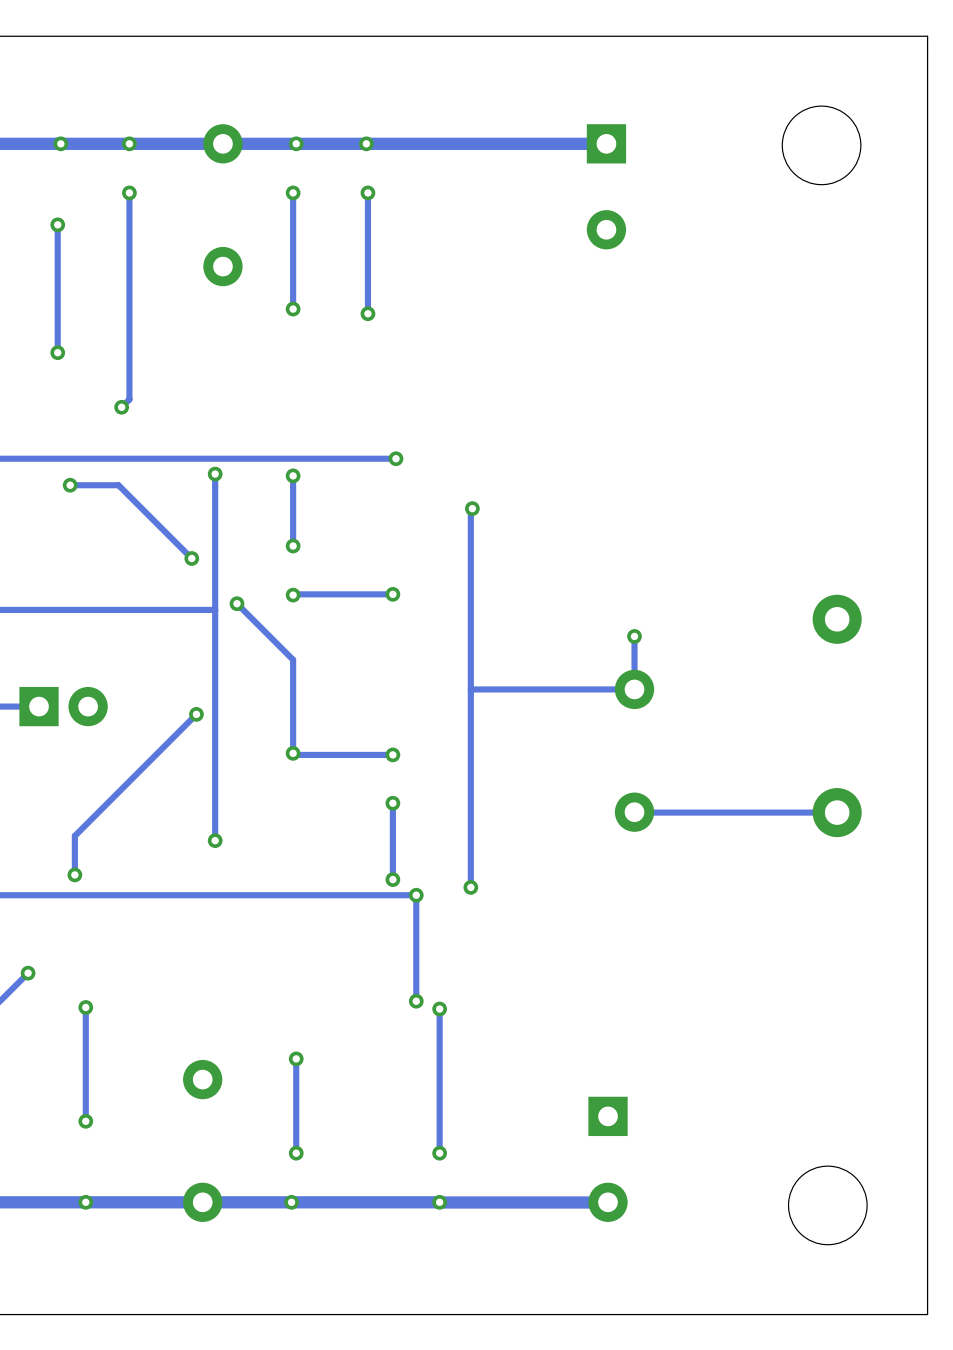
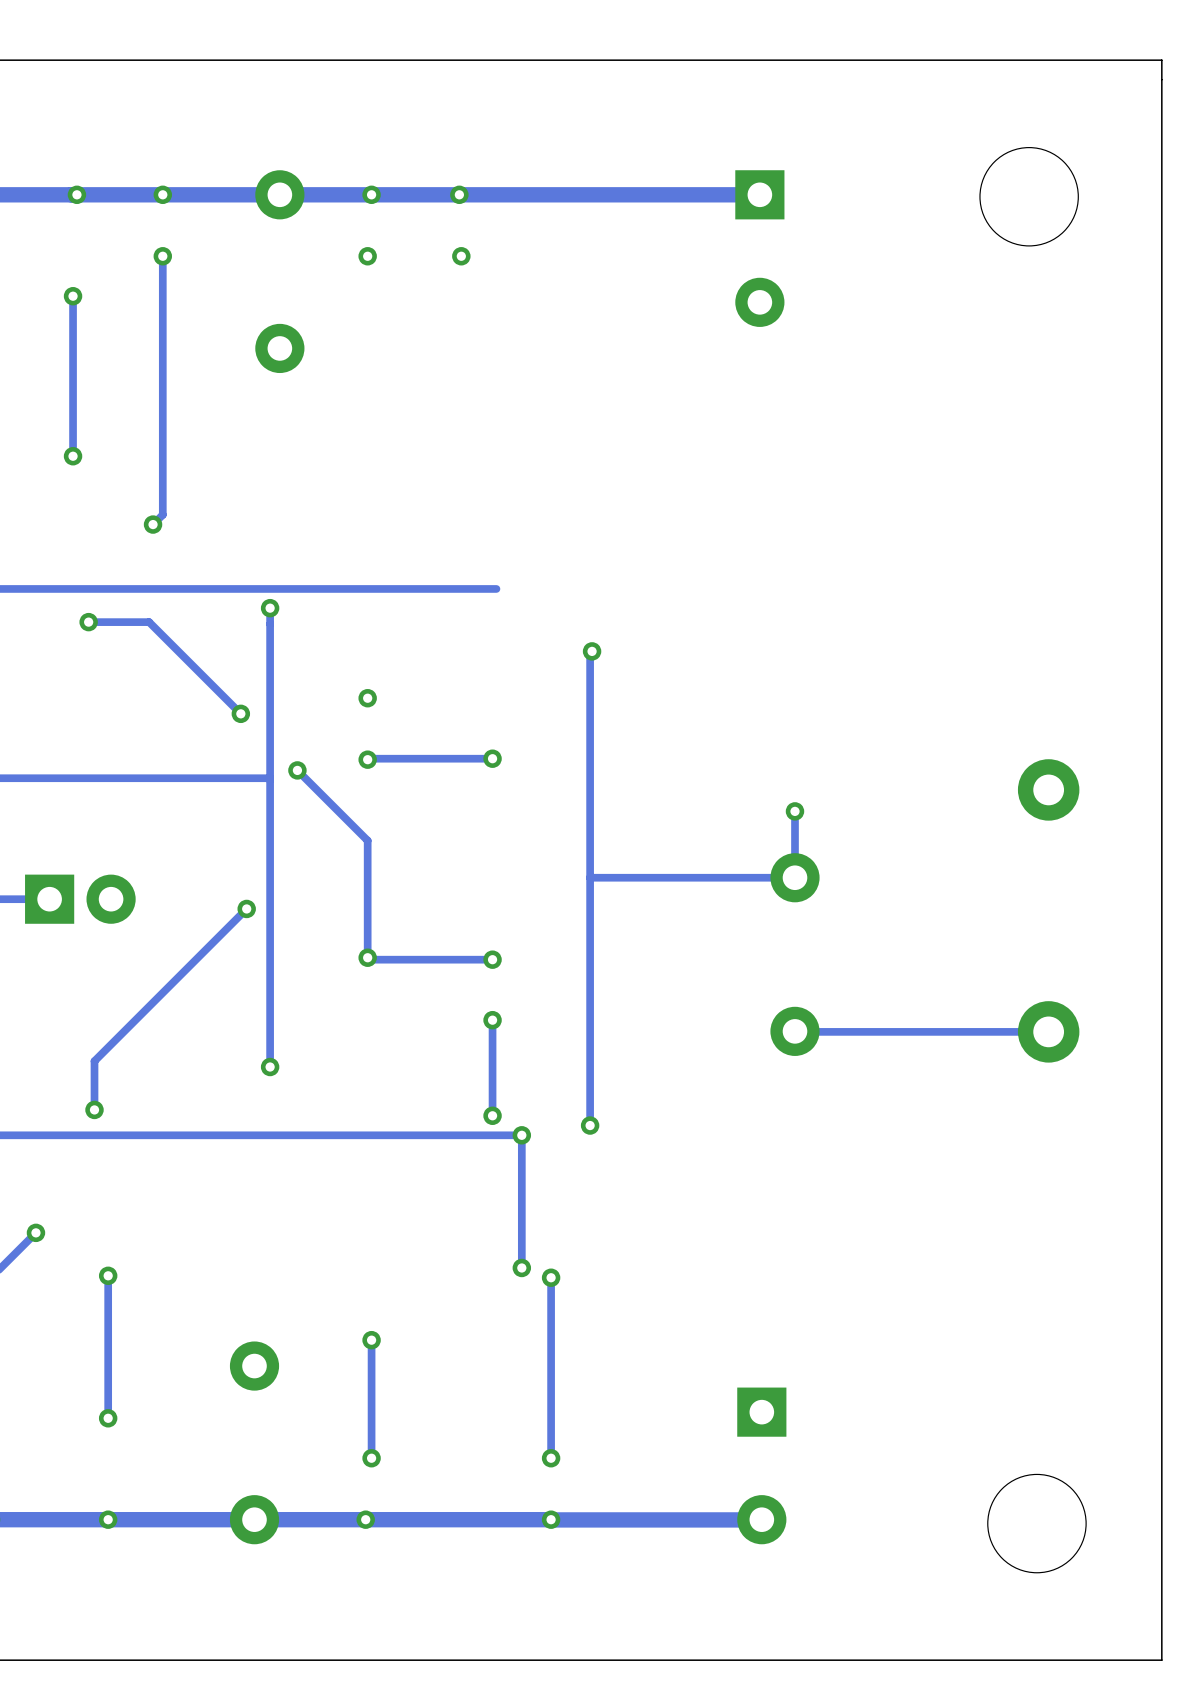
track: (293, 192) (293, 309) -> none
track: (367, 192) (367, 313) -> none
via: (293, 309) -> none
via: (367, 313) -> none
via: (396, 458) -> none
track: (293, 475) (293, 546) -> none
via: (293, 475) -> none

